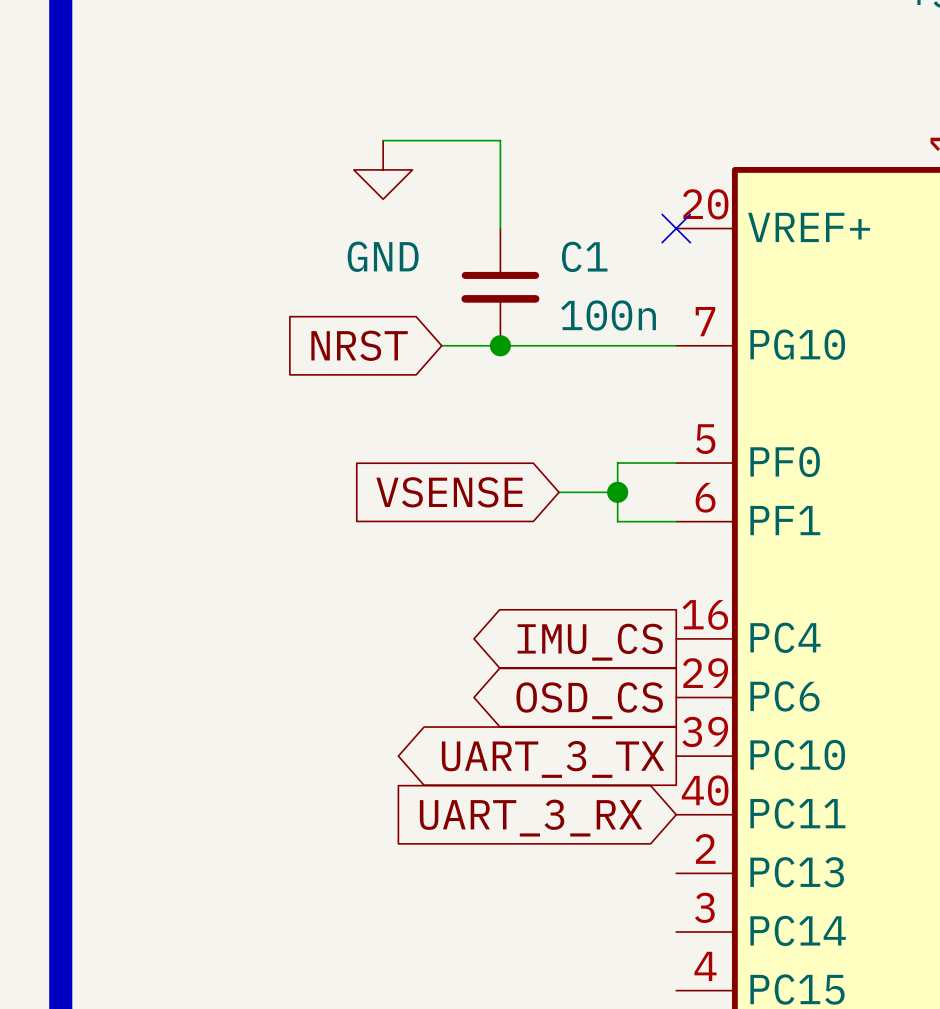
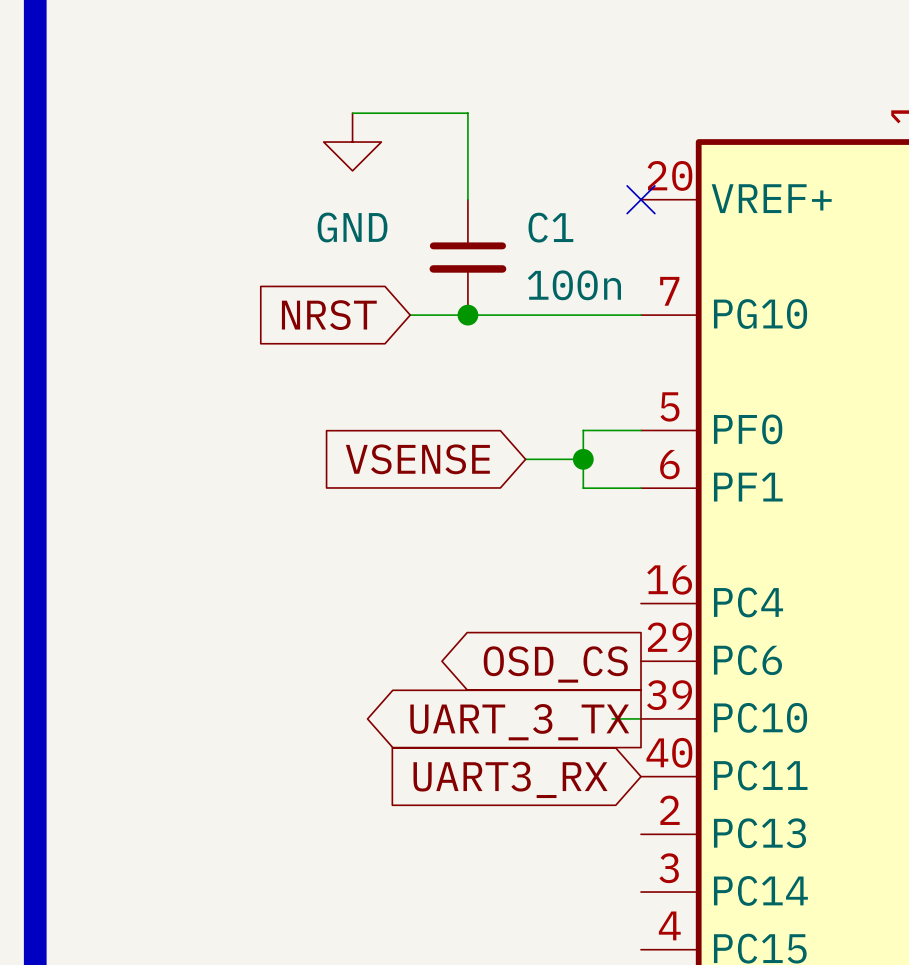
global label: IMU_CS (590, 642) -> none
wire: none -> (612, 718) (641, 718)
global label: UART_3_RX (531, 818) -> UART3_RX (510, 779)

